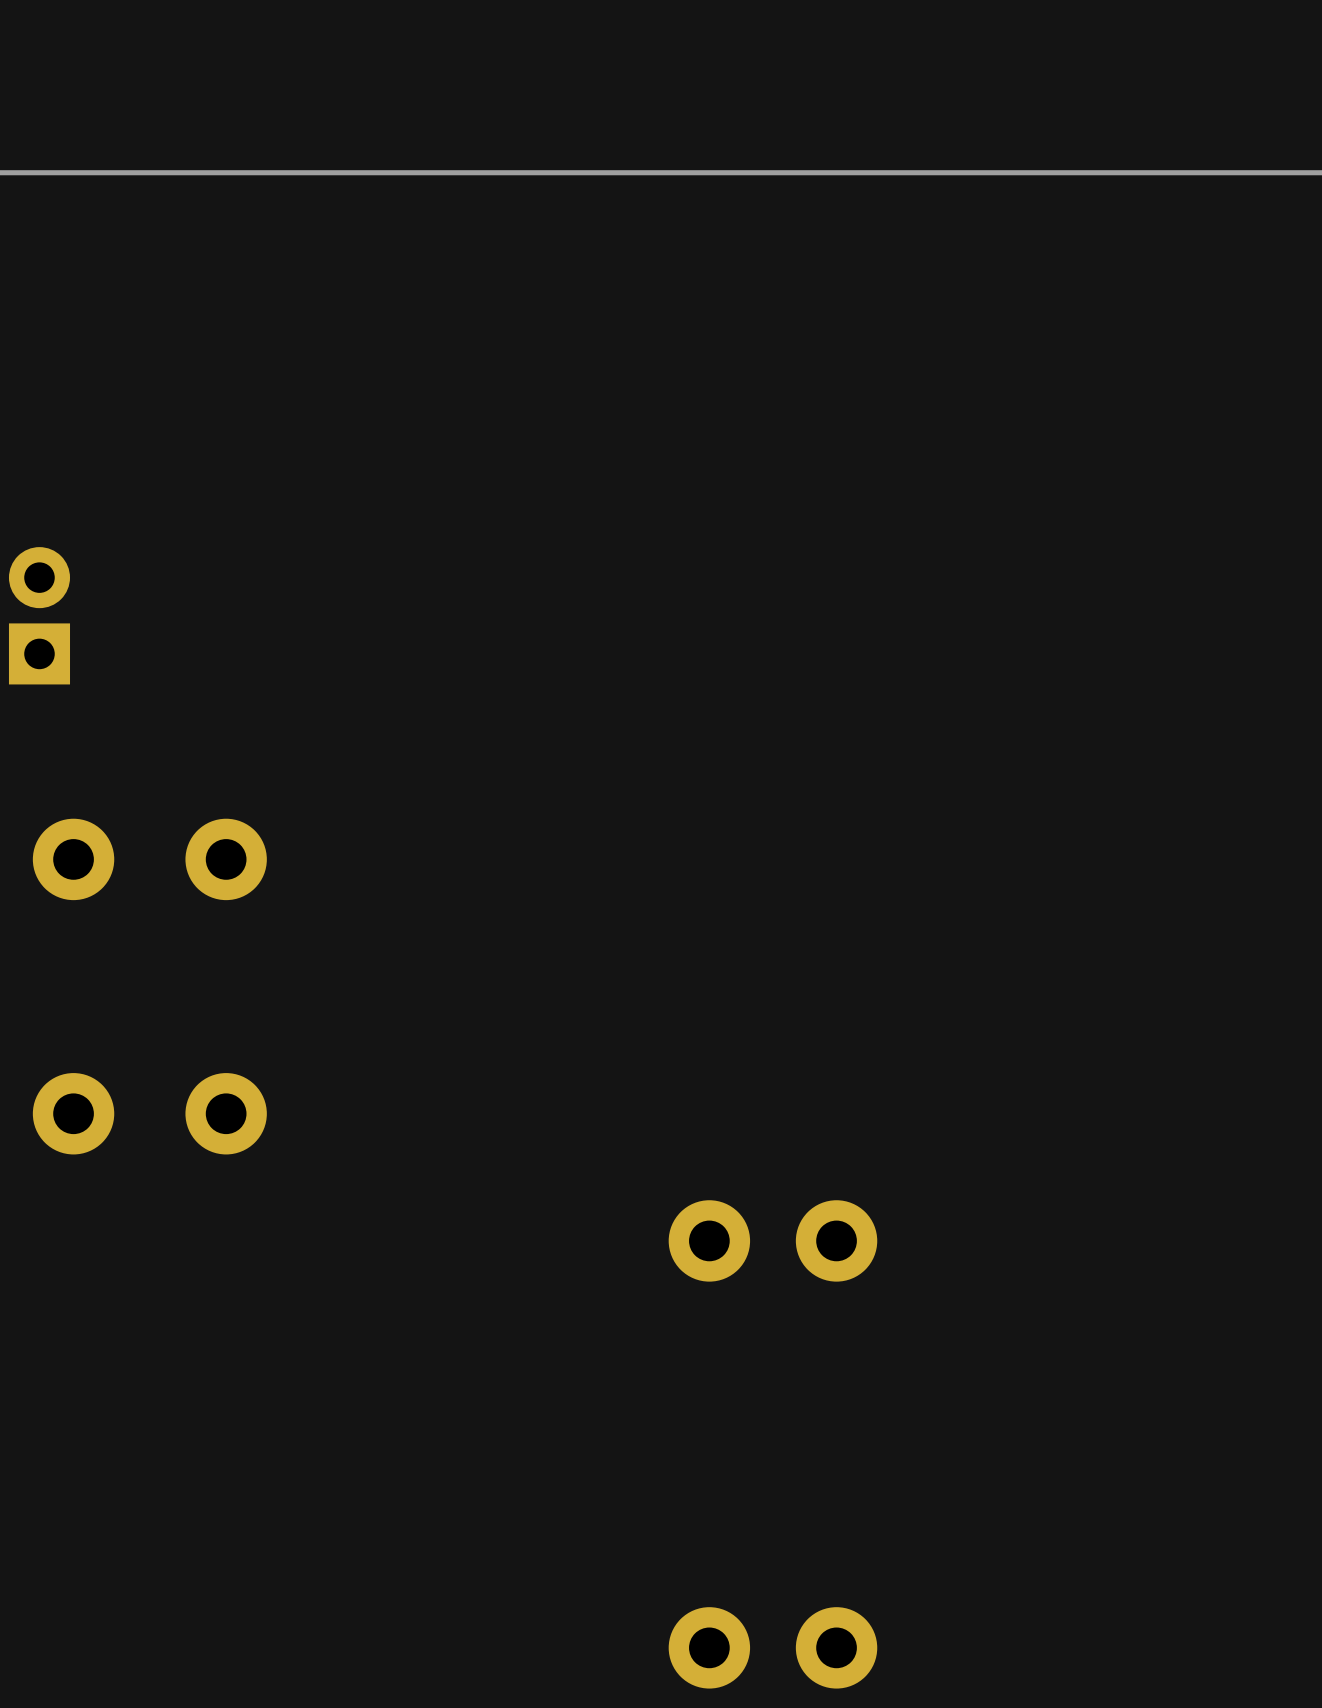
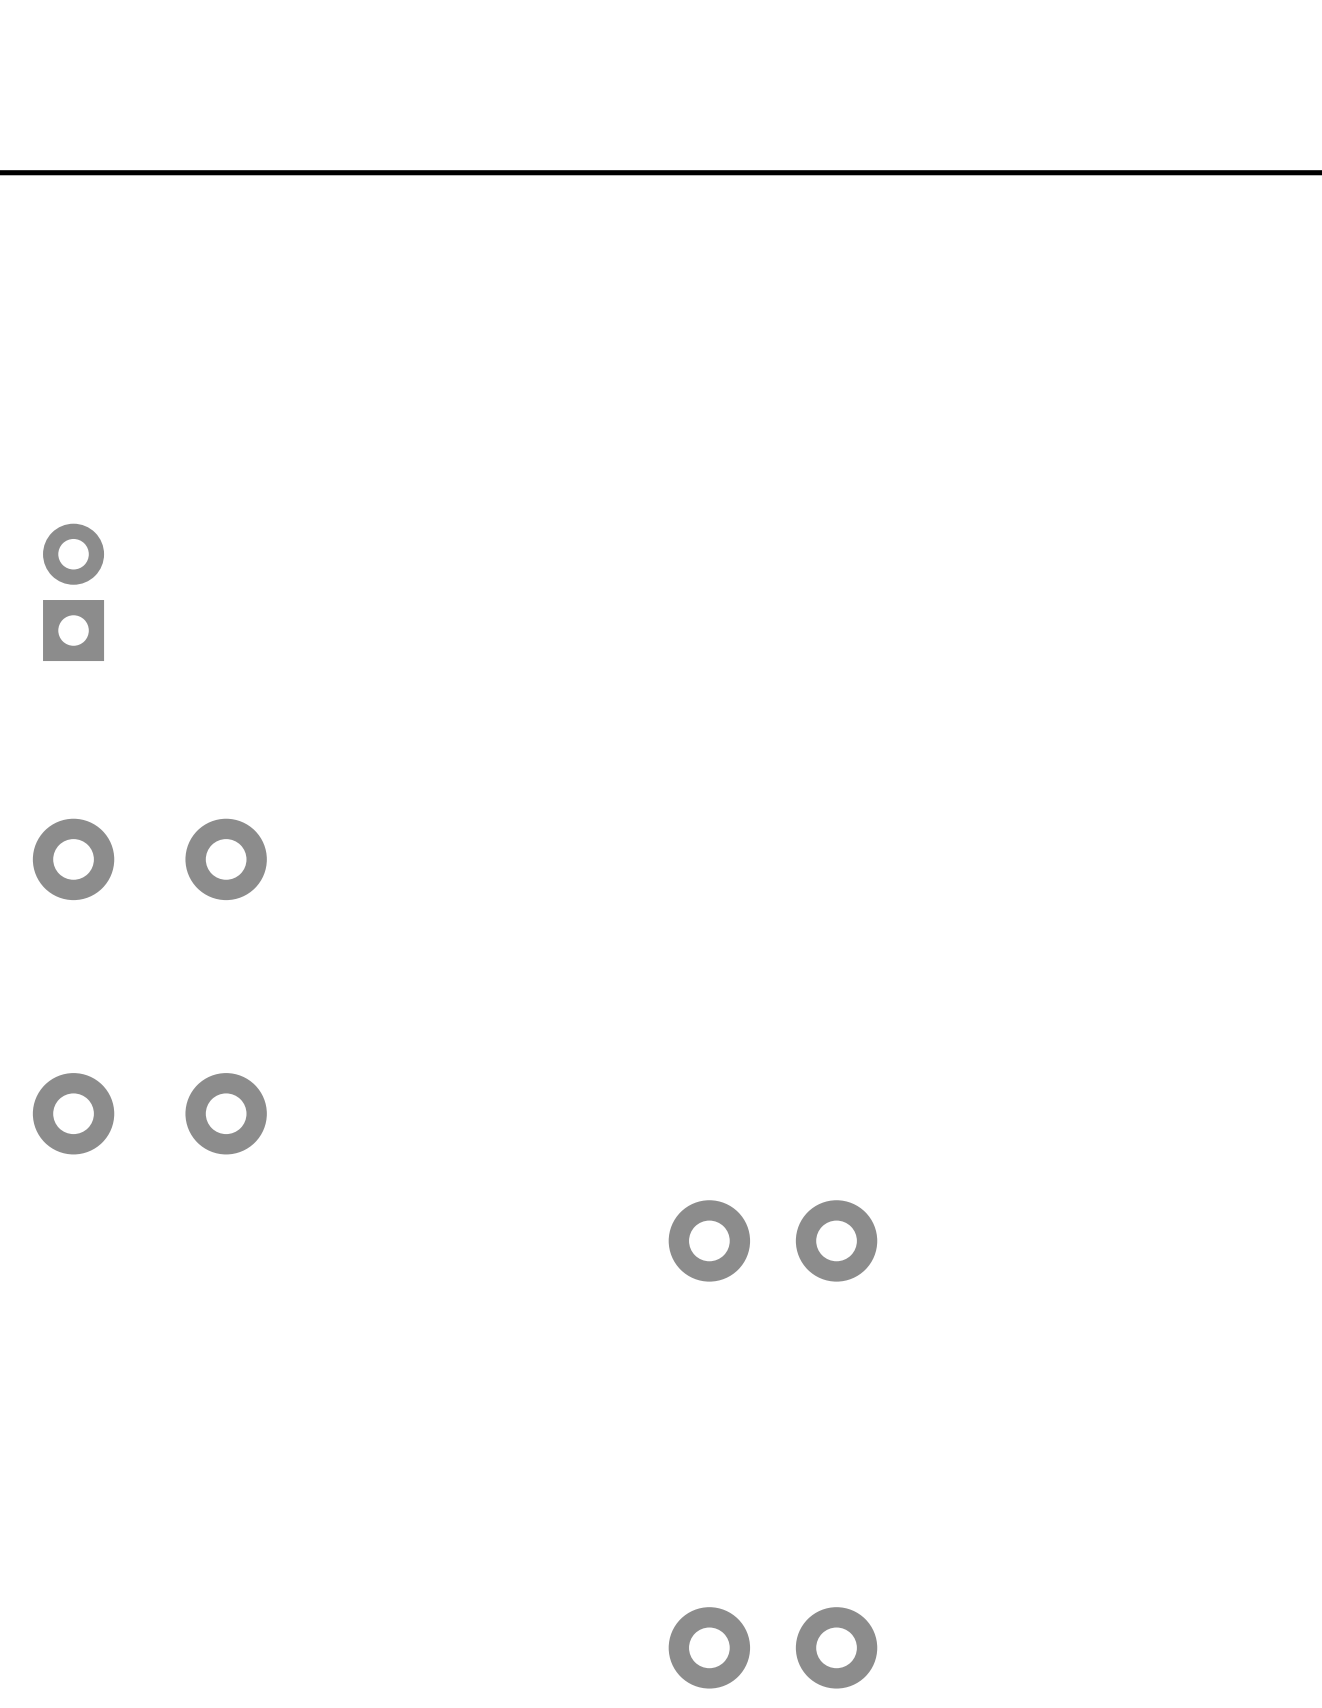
part position: (39, 615) -> (73, 592)

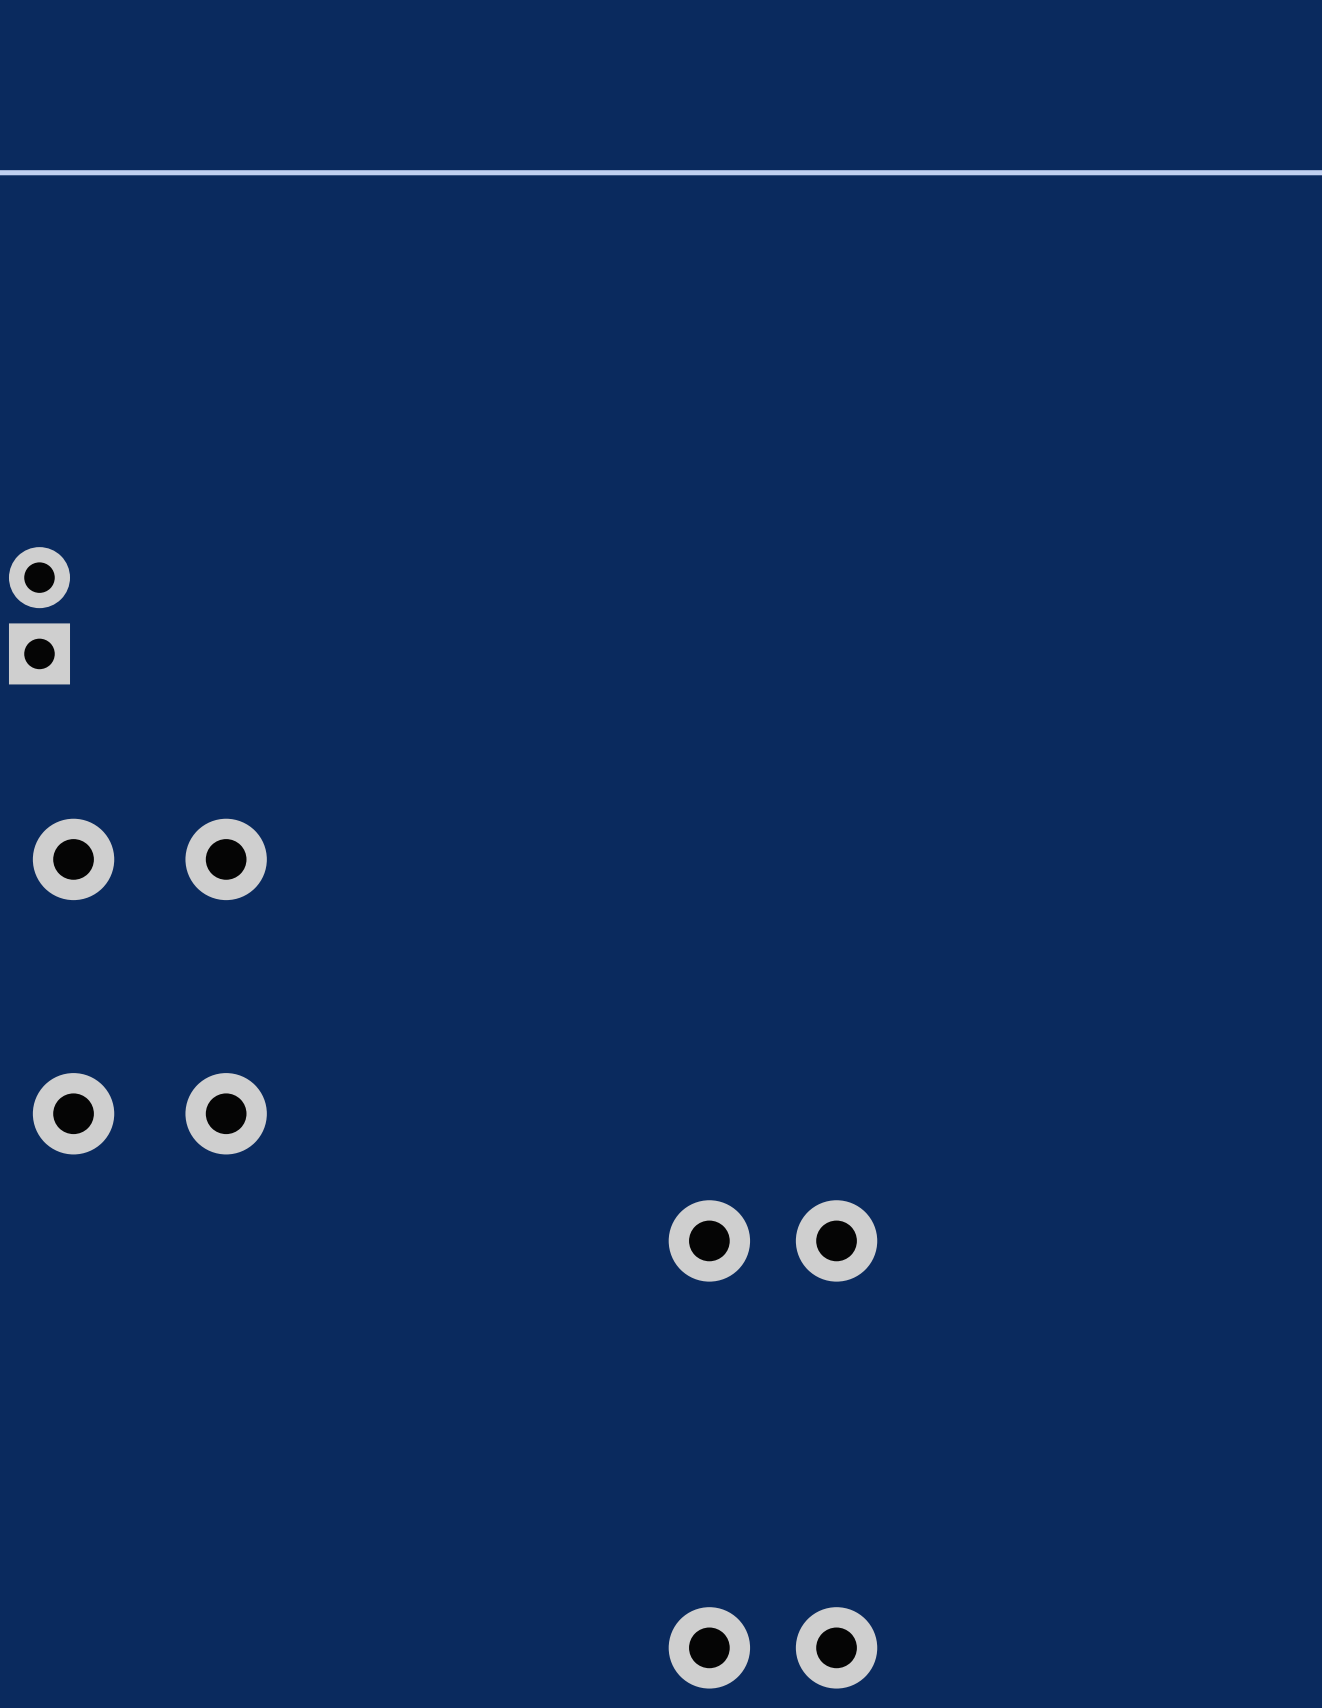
part position: (73, 592) -> (39, 615)

